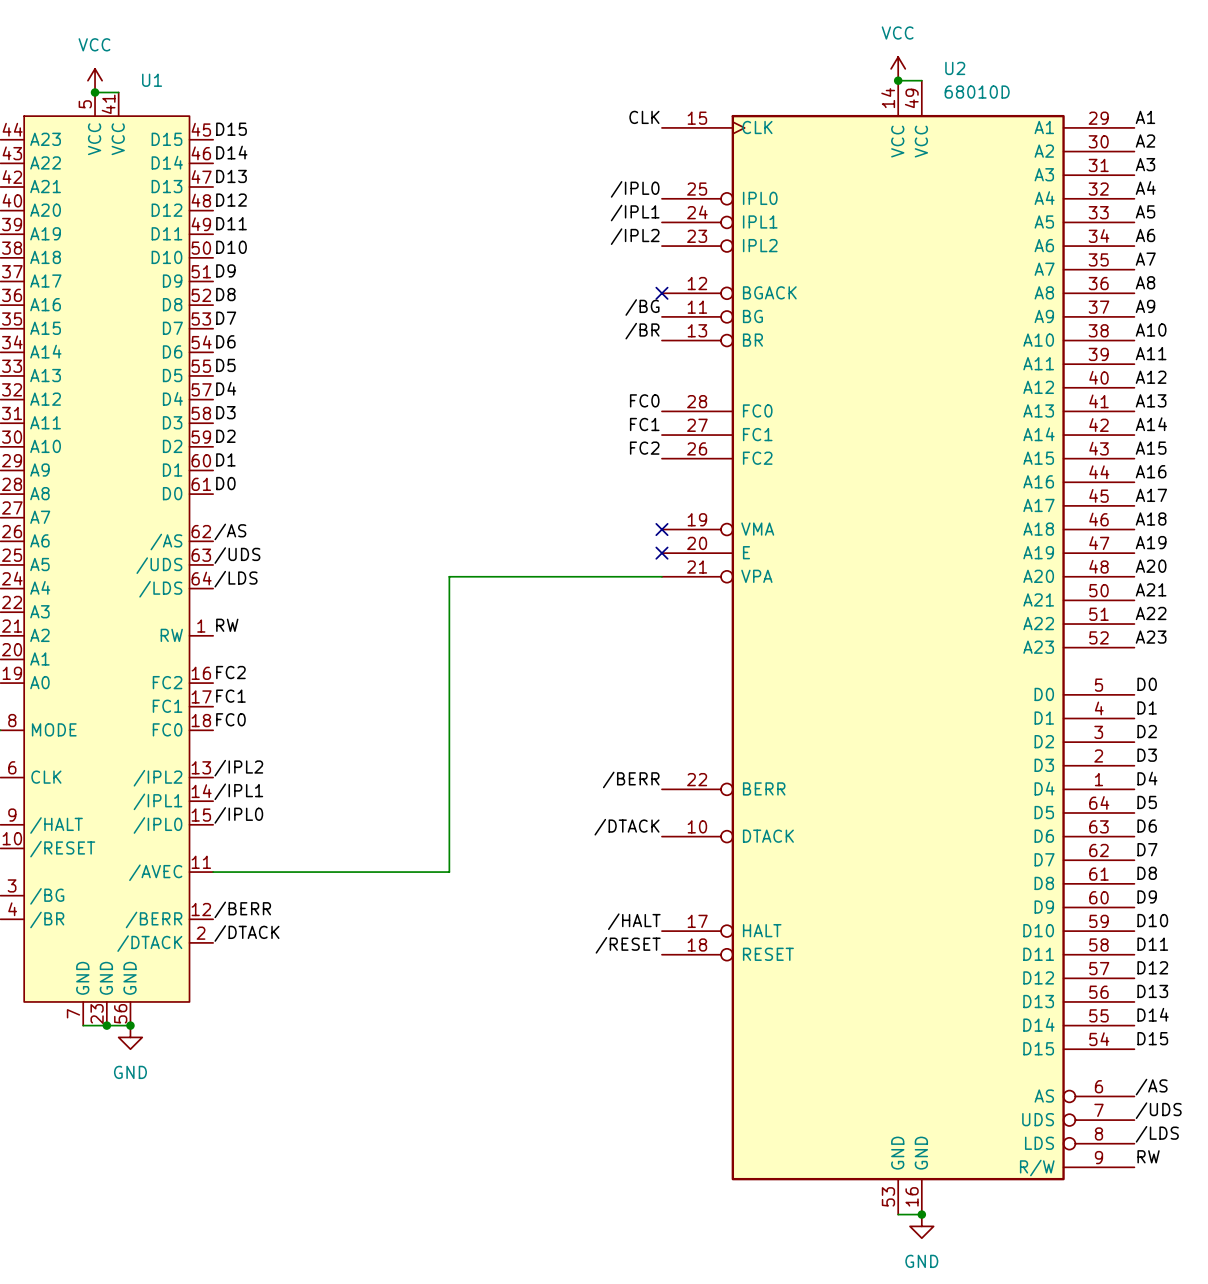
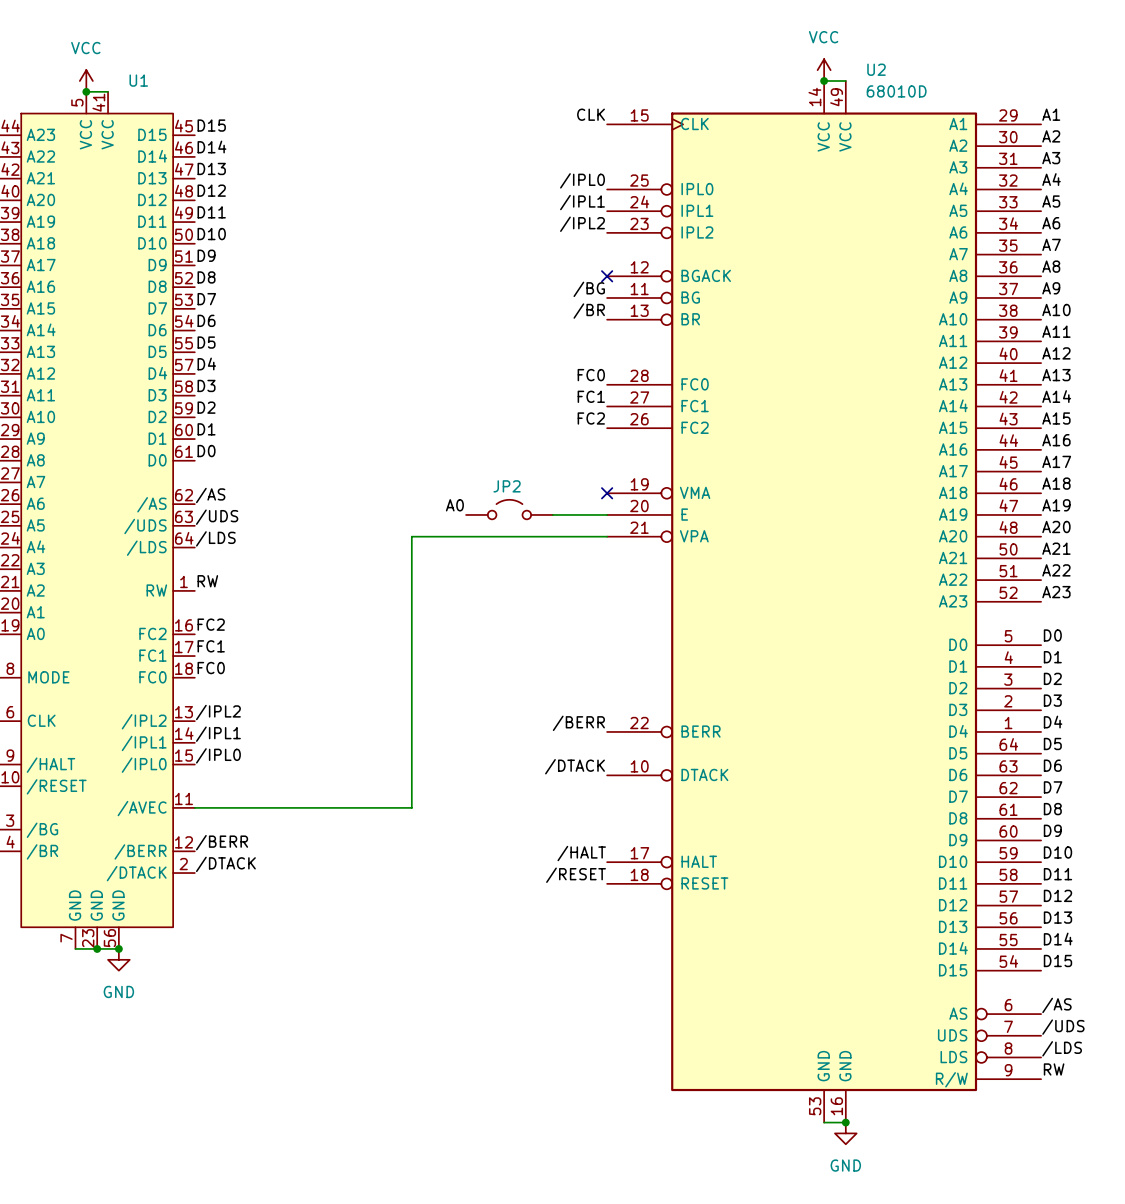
label: none -> A0 (454, 505)
JP2: none -> (509, 509)
wire: none -> (552, 514) (607, 514)
no-connect mark: (661, 553) -> none

